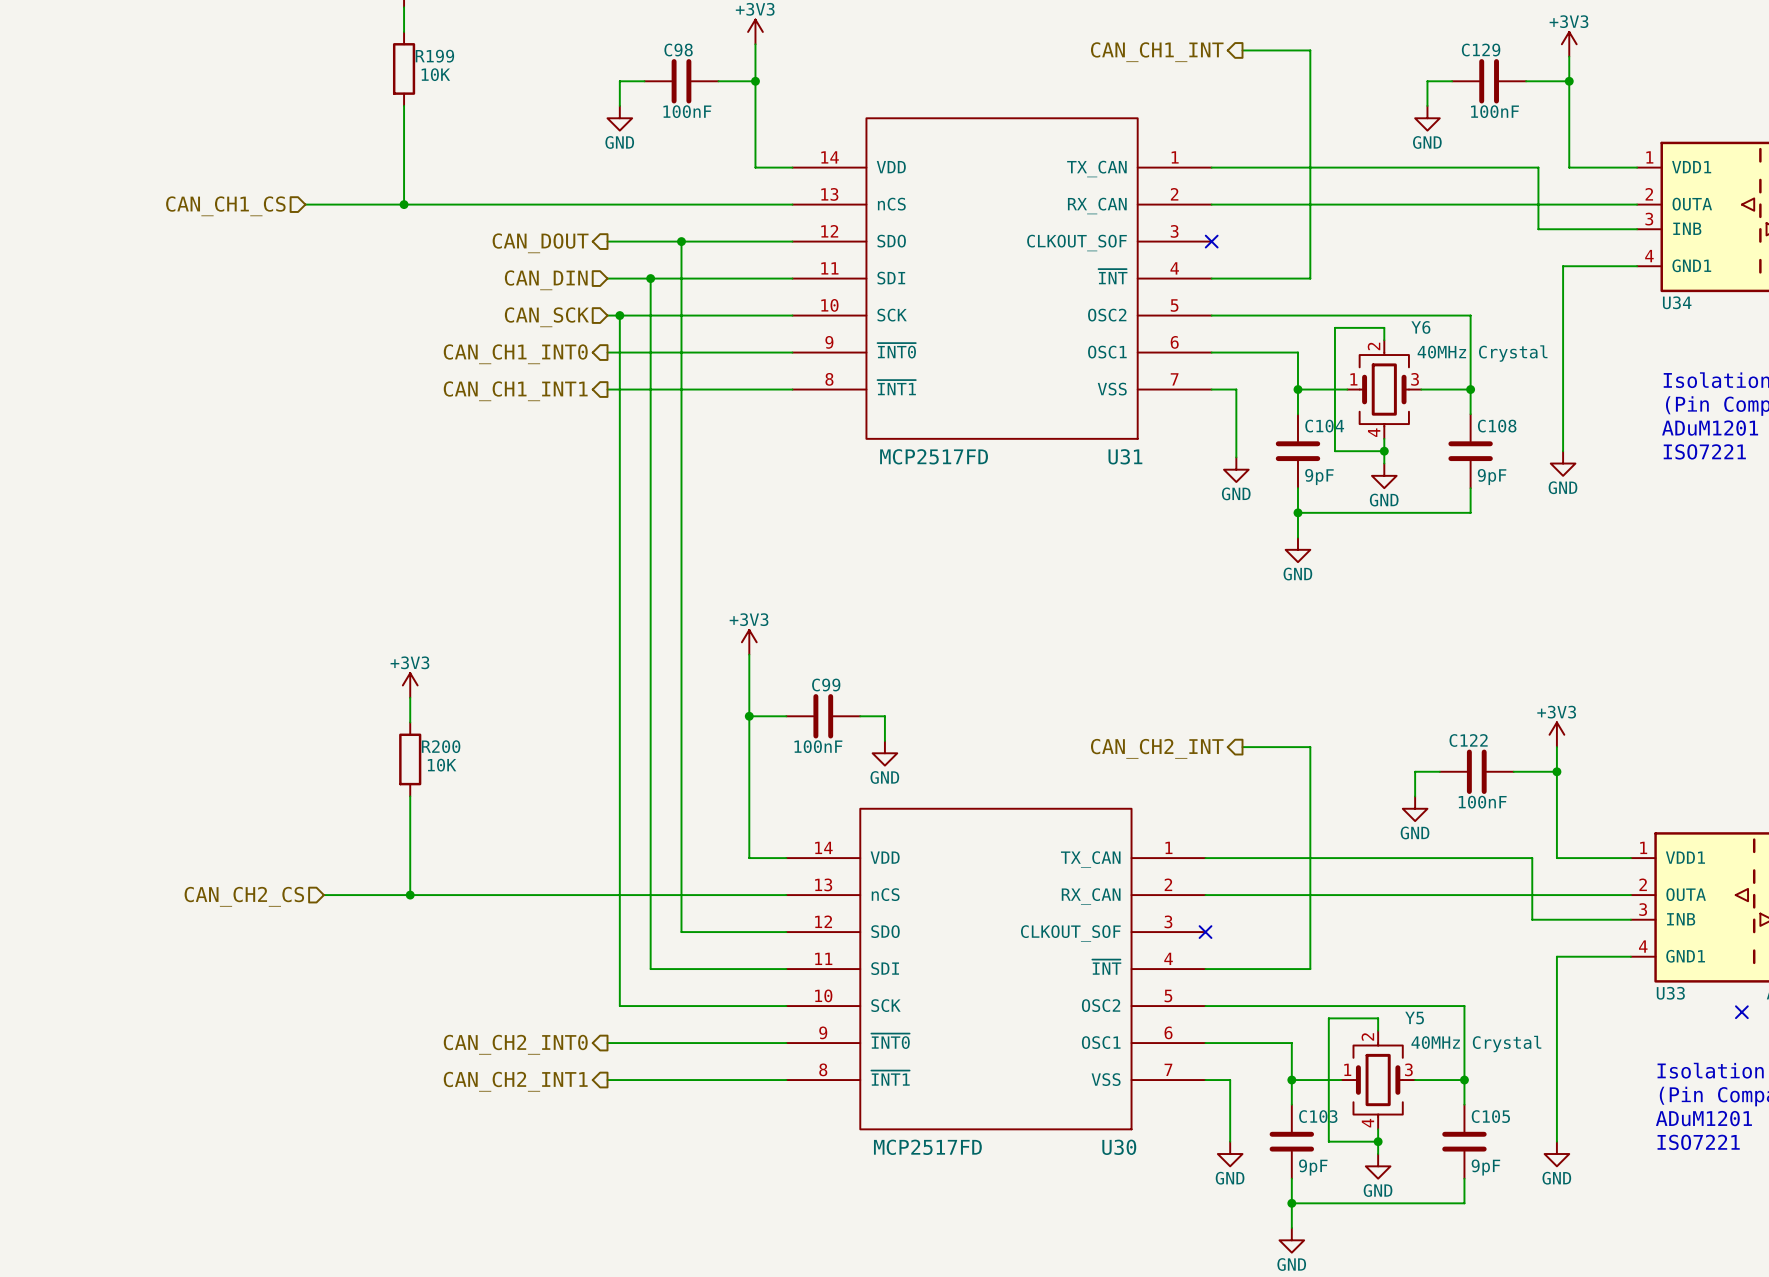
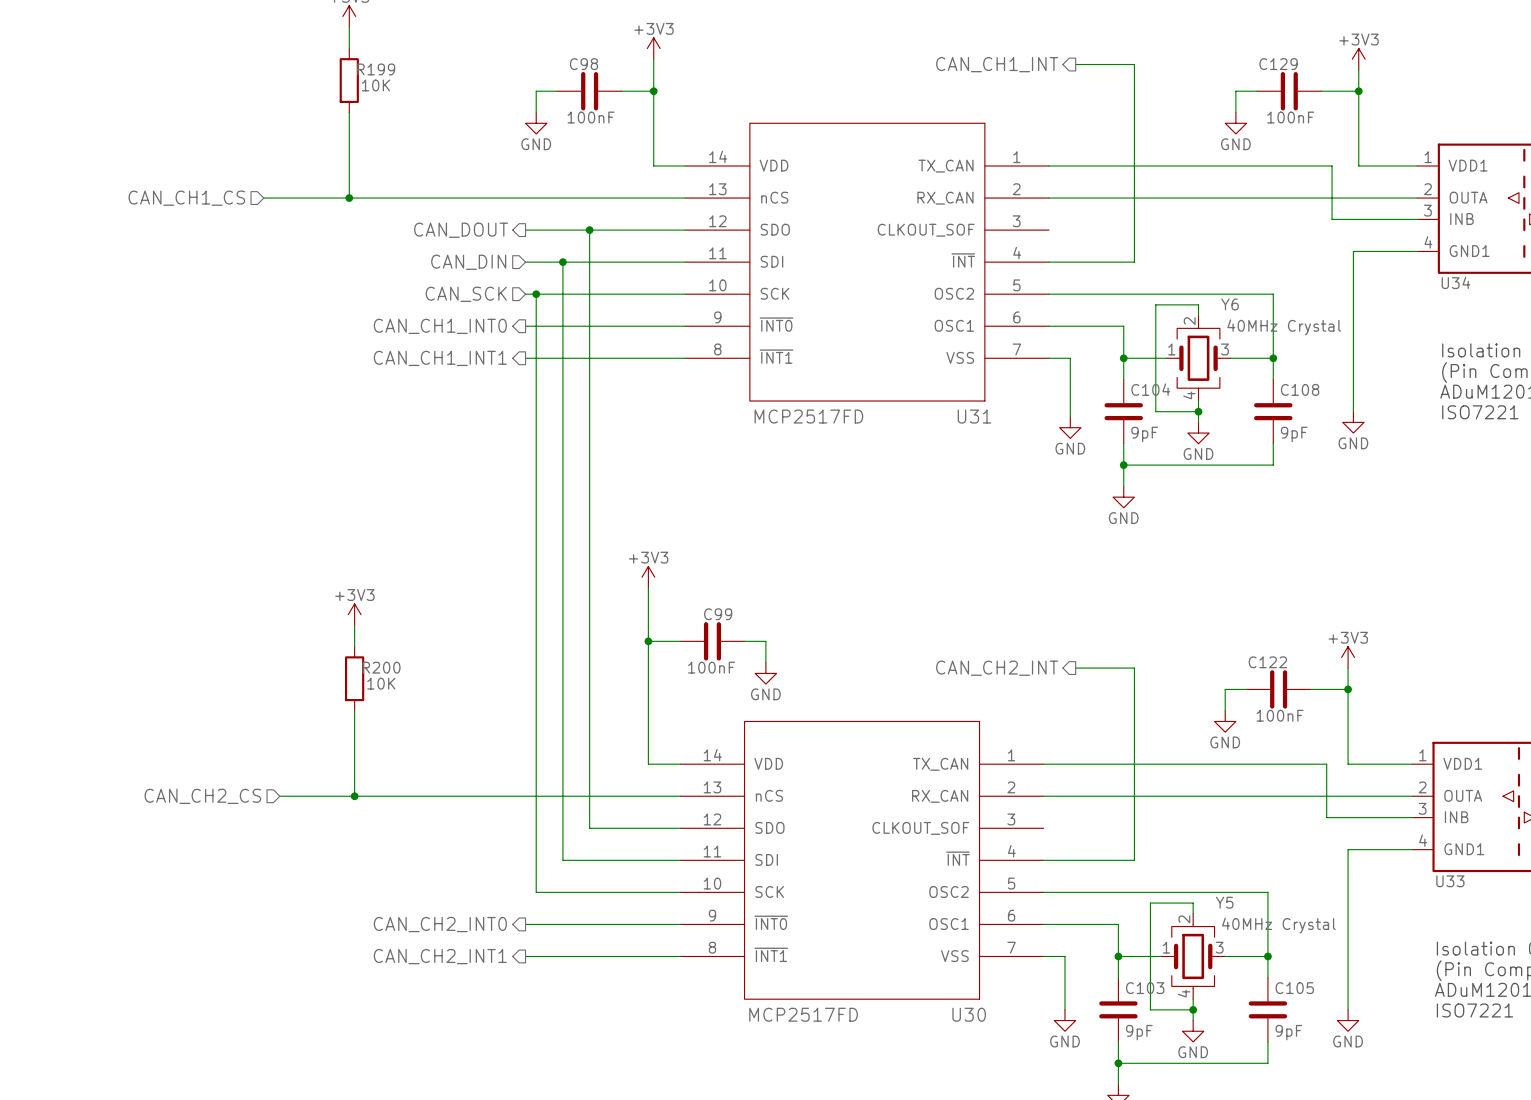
no-connect mark: (1211, 241) -> none
no-connect mark: (1205, 932) -> none
no-connect mark: (1741, 1012) -> none

